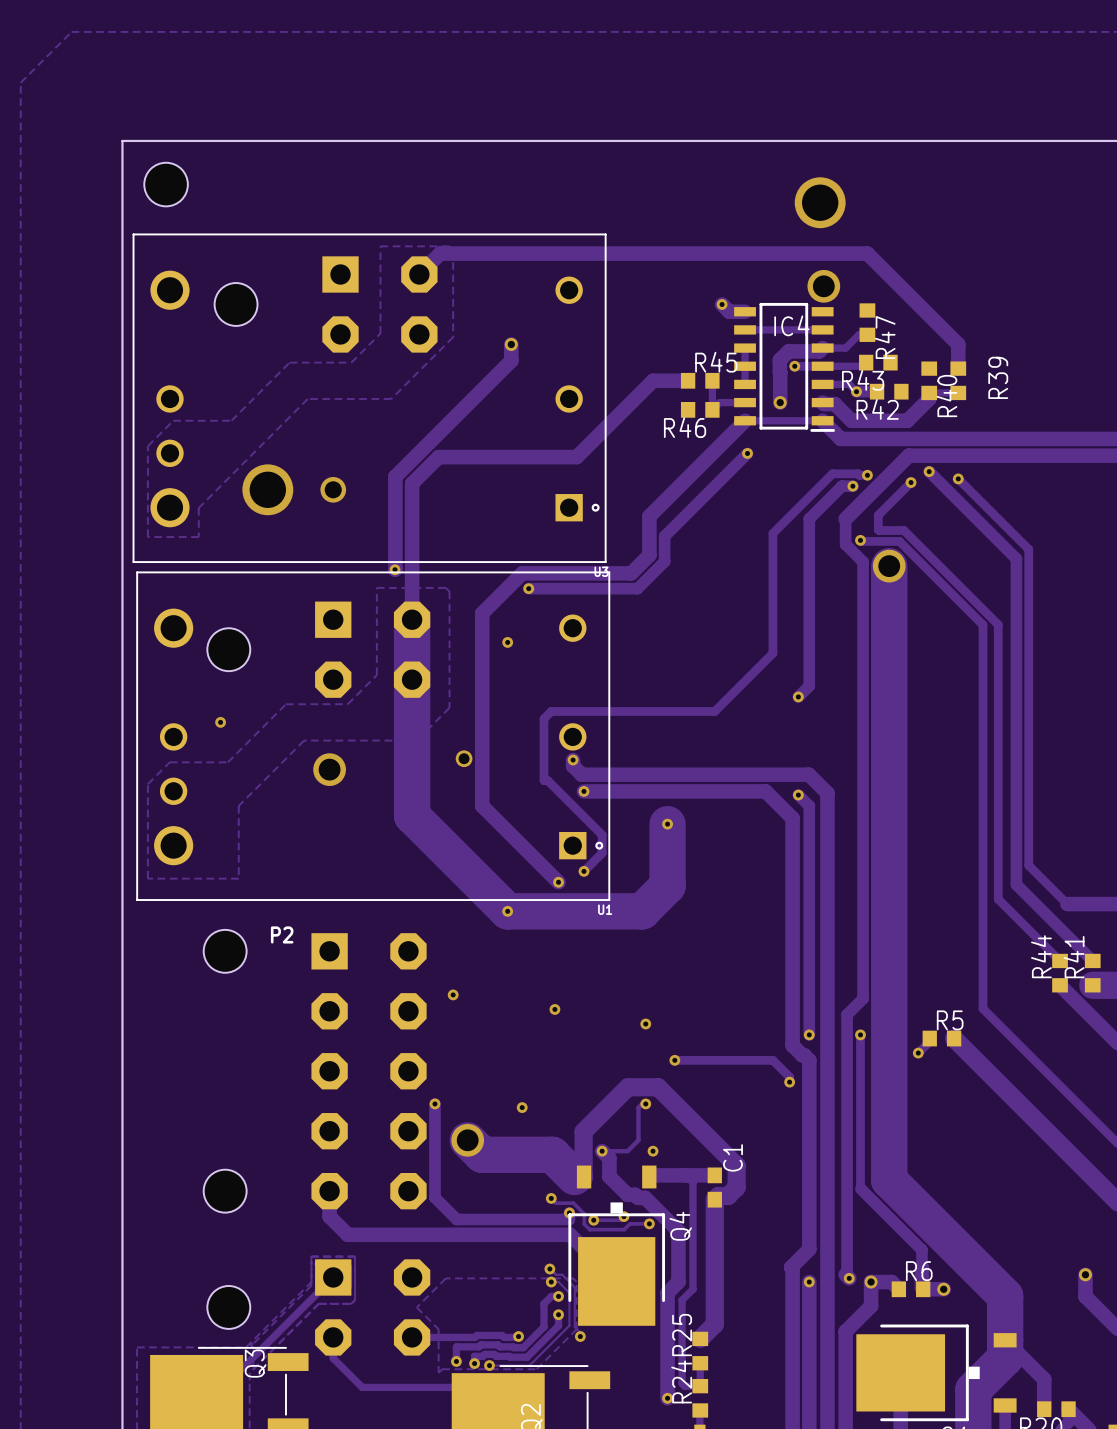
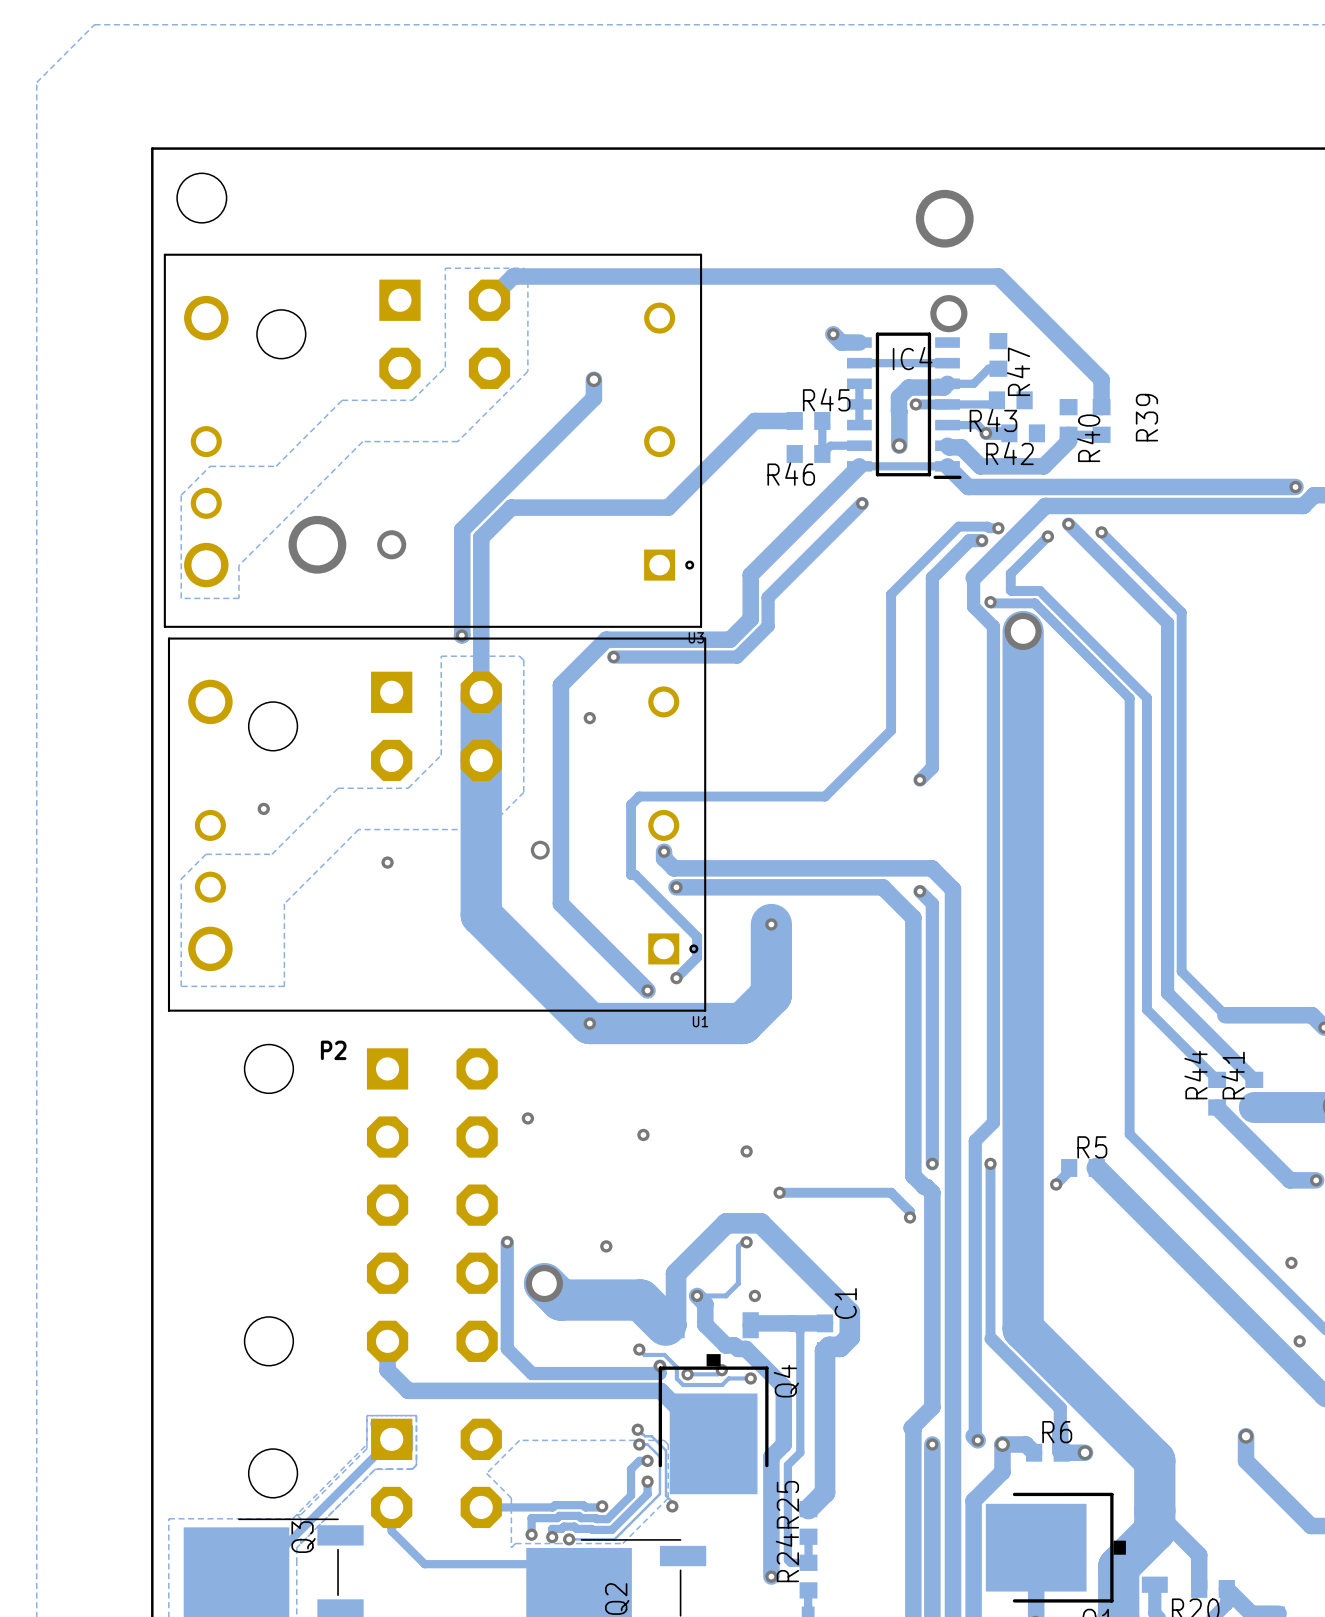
via size: [313, 753, 346, 786] -> [381, 856, 394, 869]

